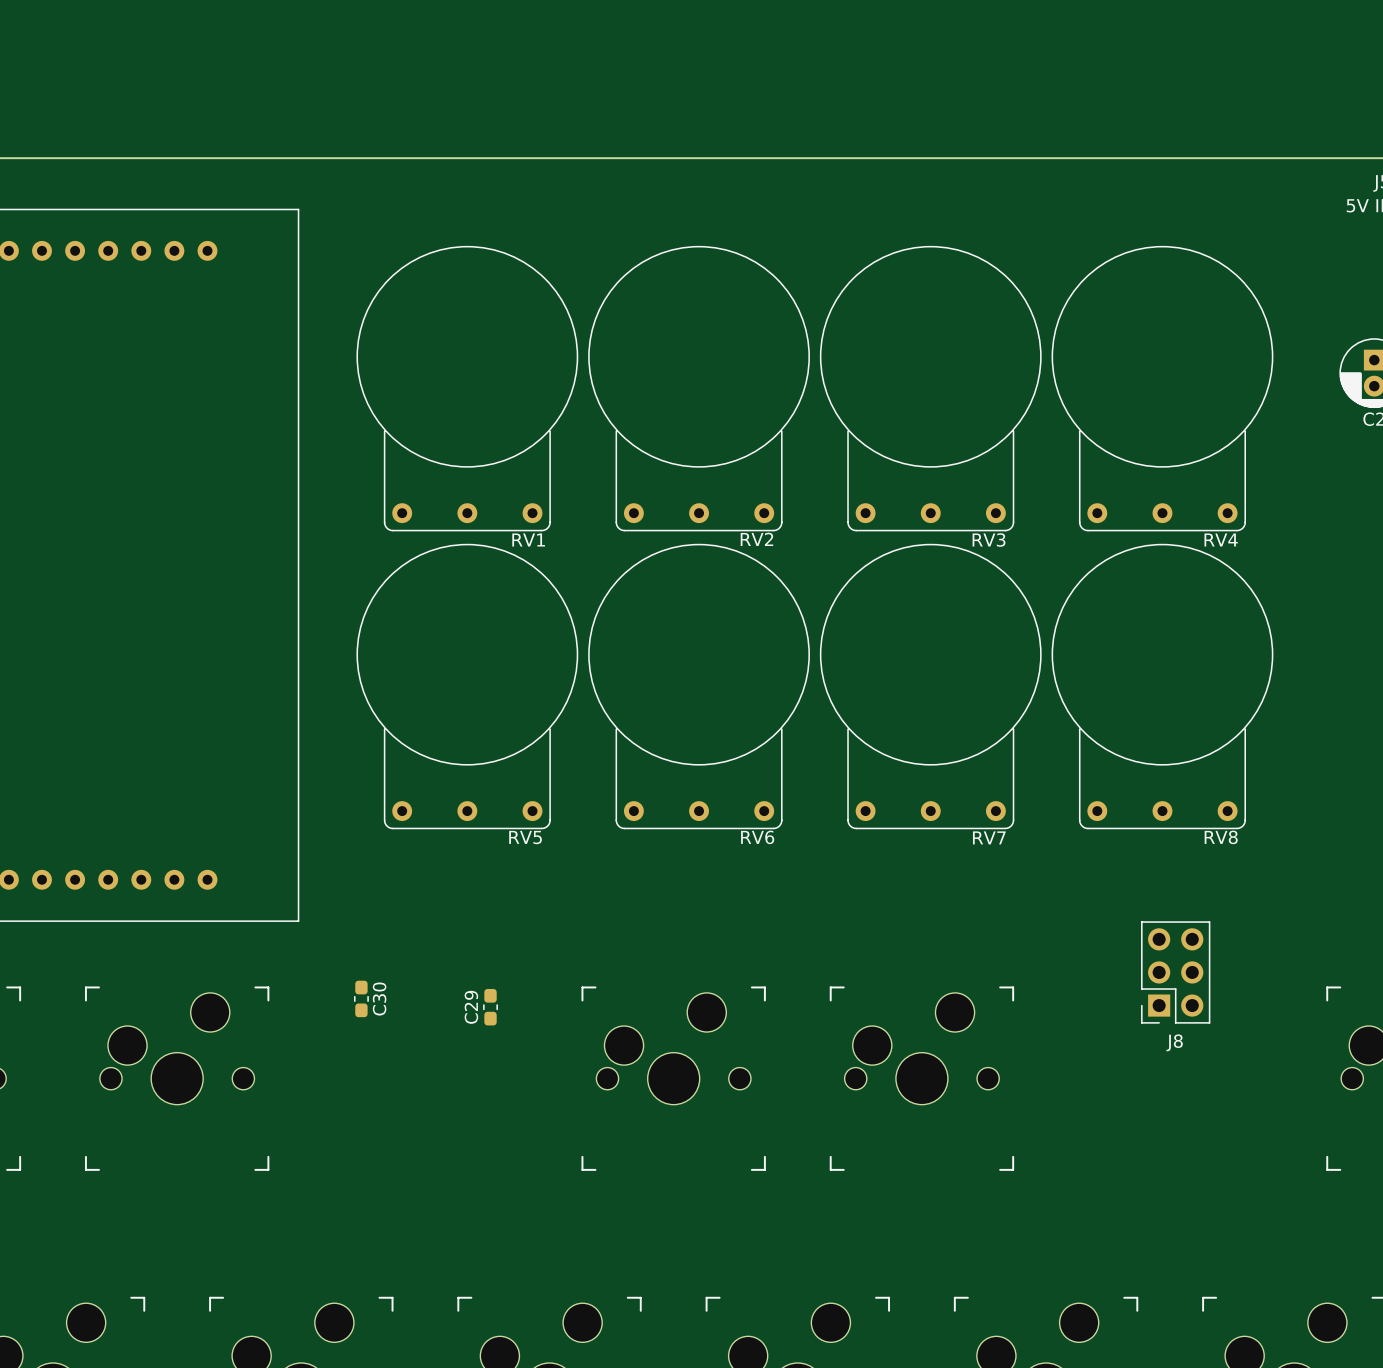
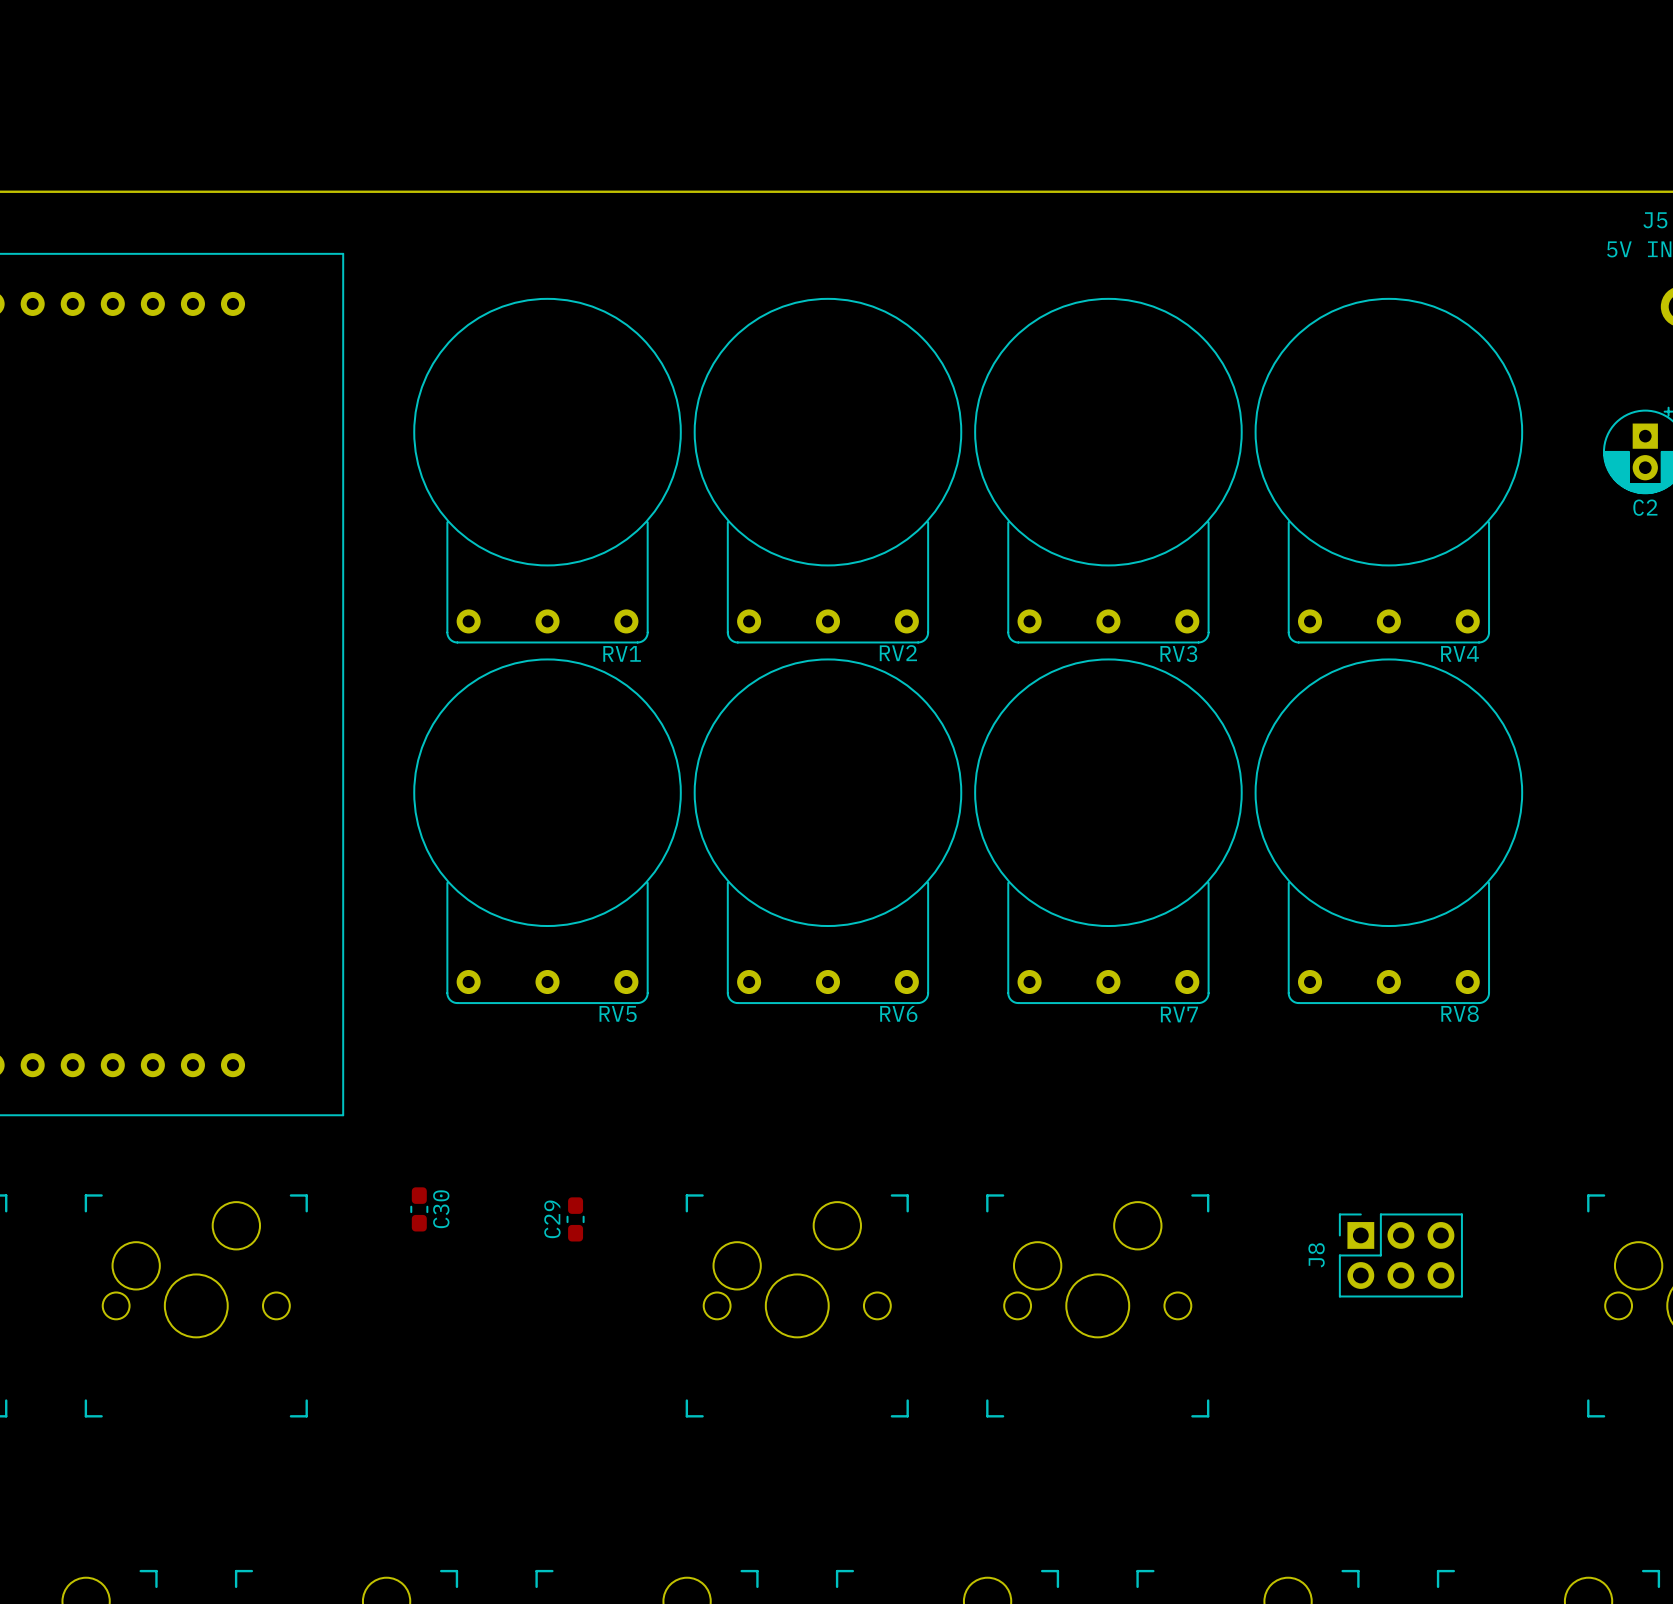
J8 rotation: 0° (1175, 972) -> 90° clockwise (1400, 1255)
J8 position: (1175, 972) -> (1400, 1255)

